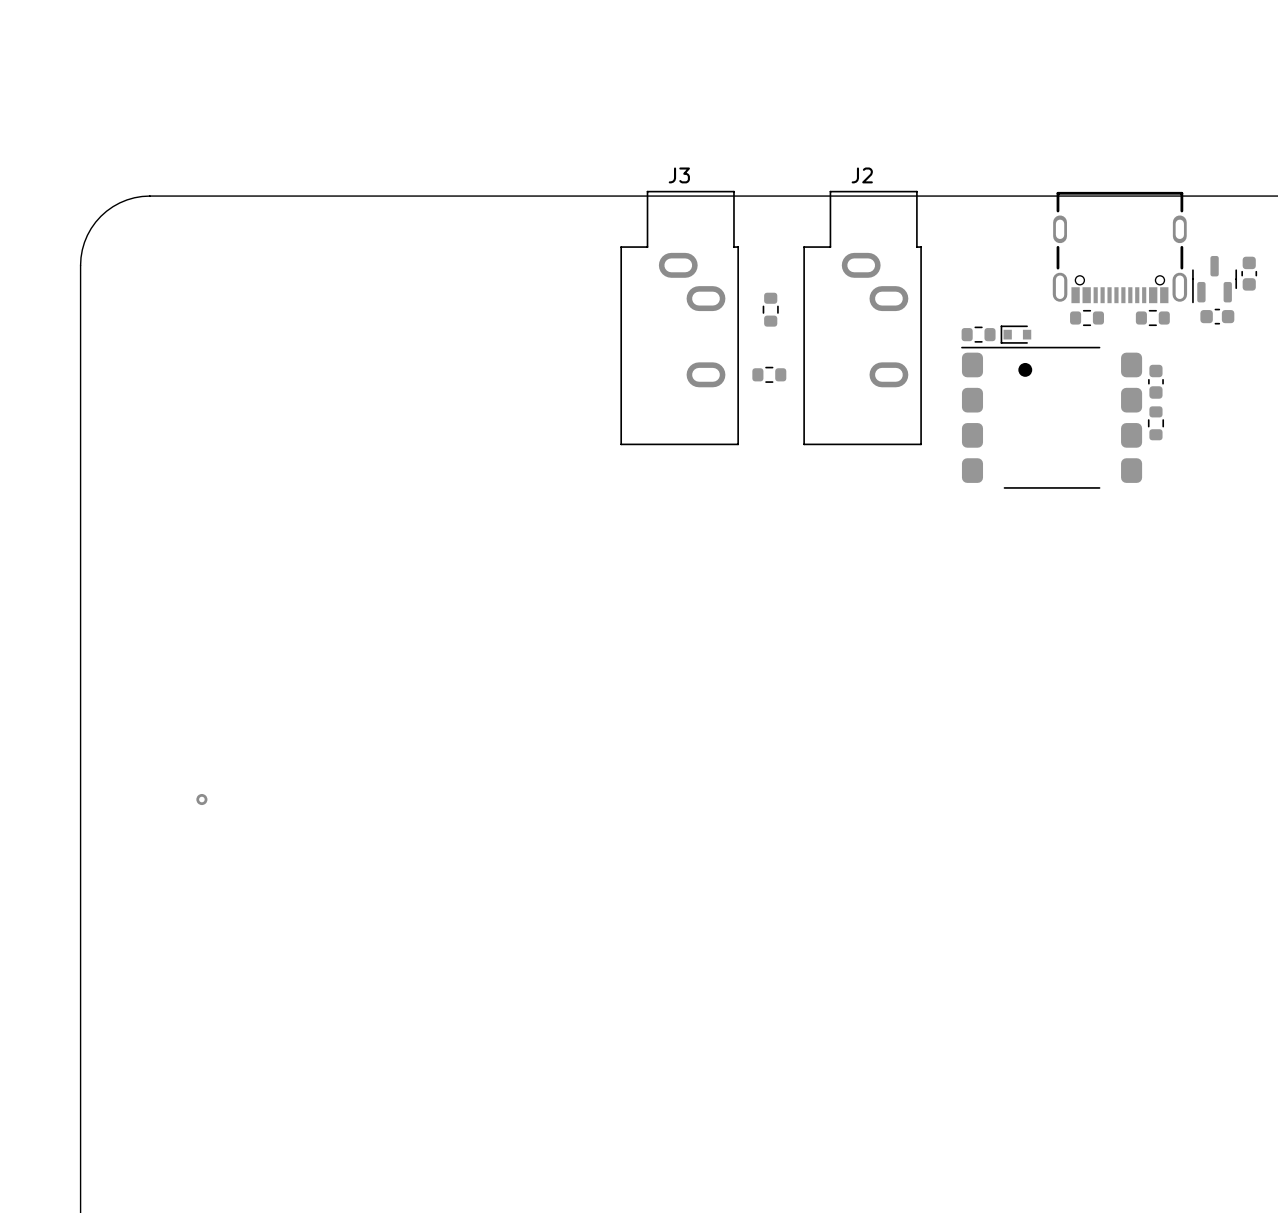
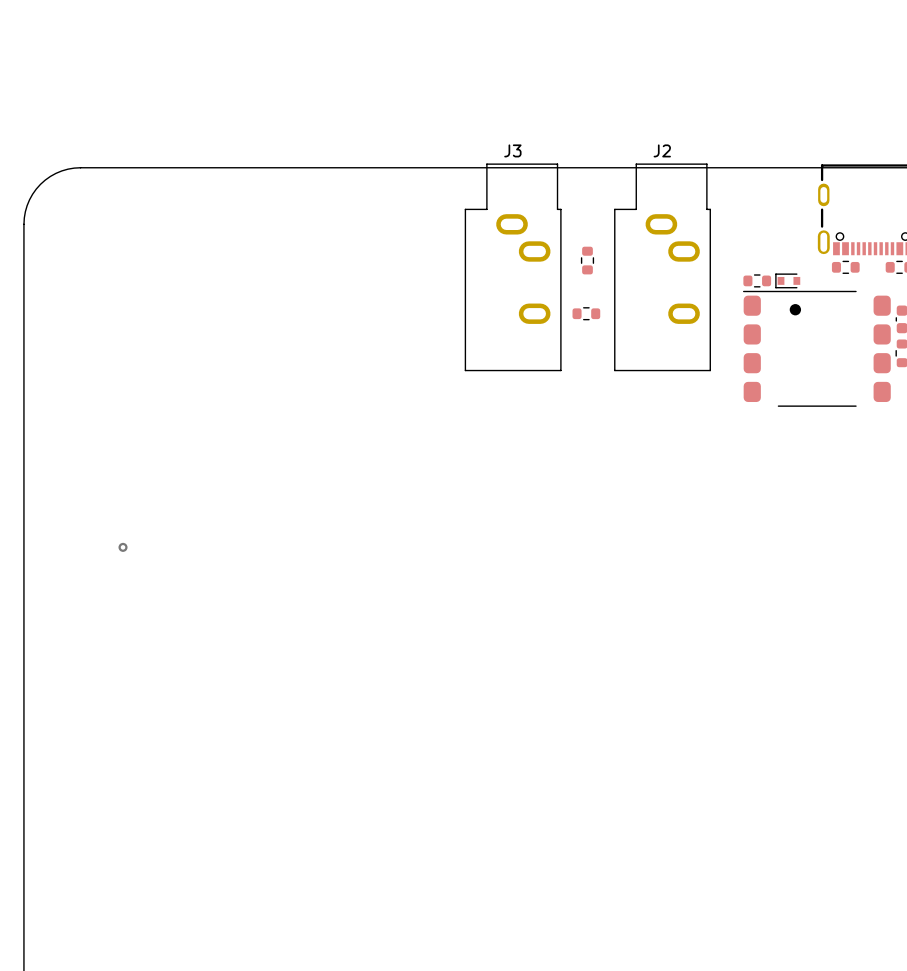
via: none -> (123, 547)
via: (201, 799) -> none

